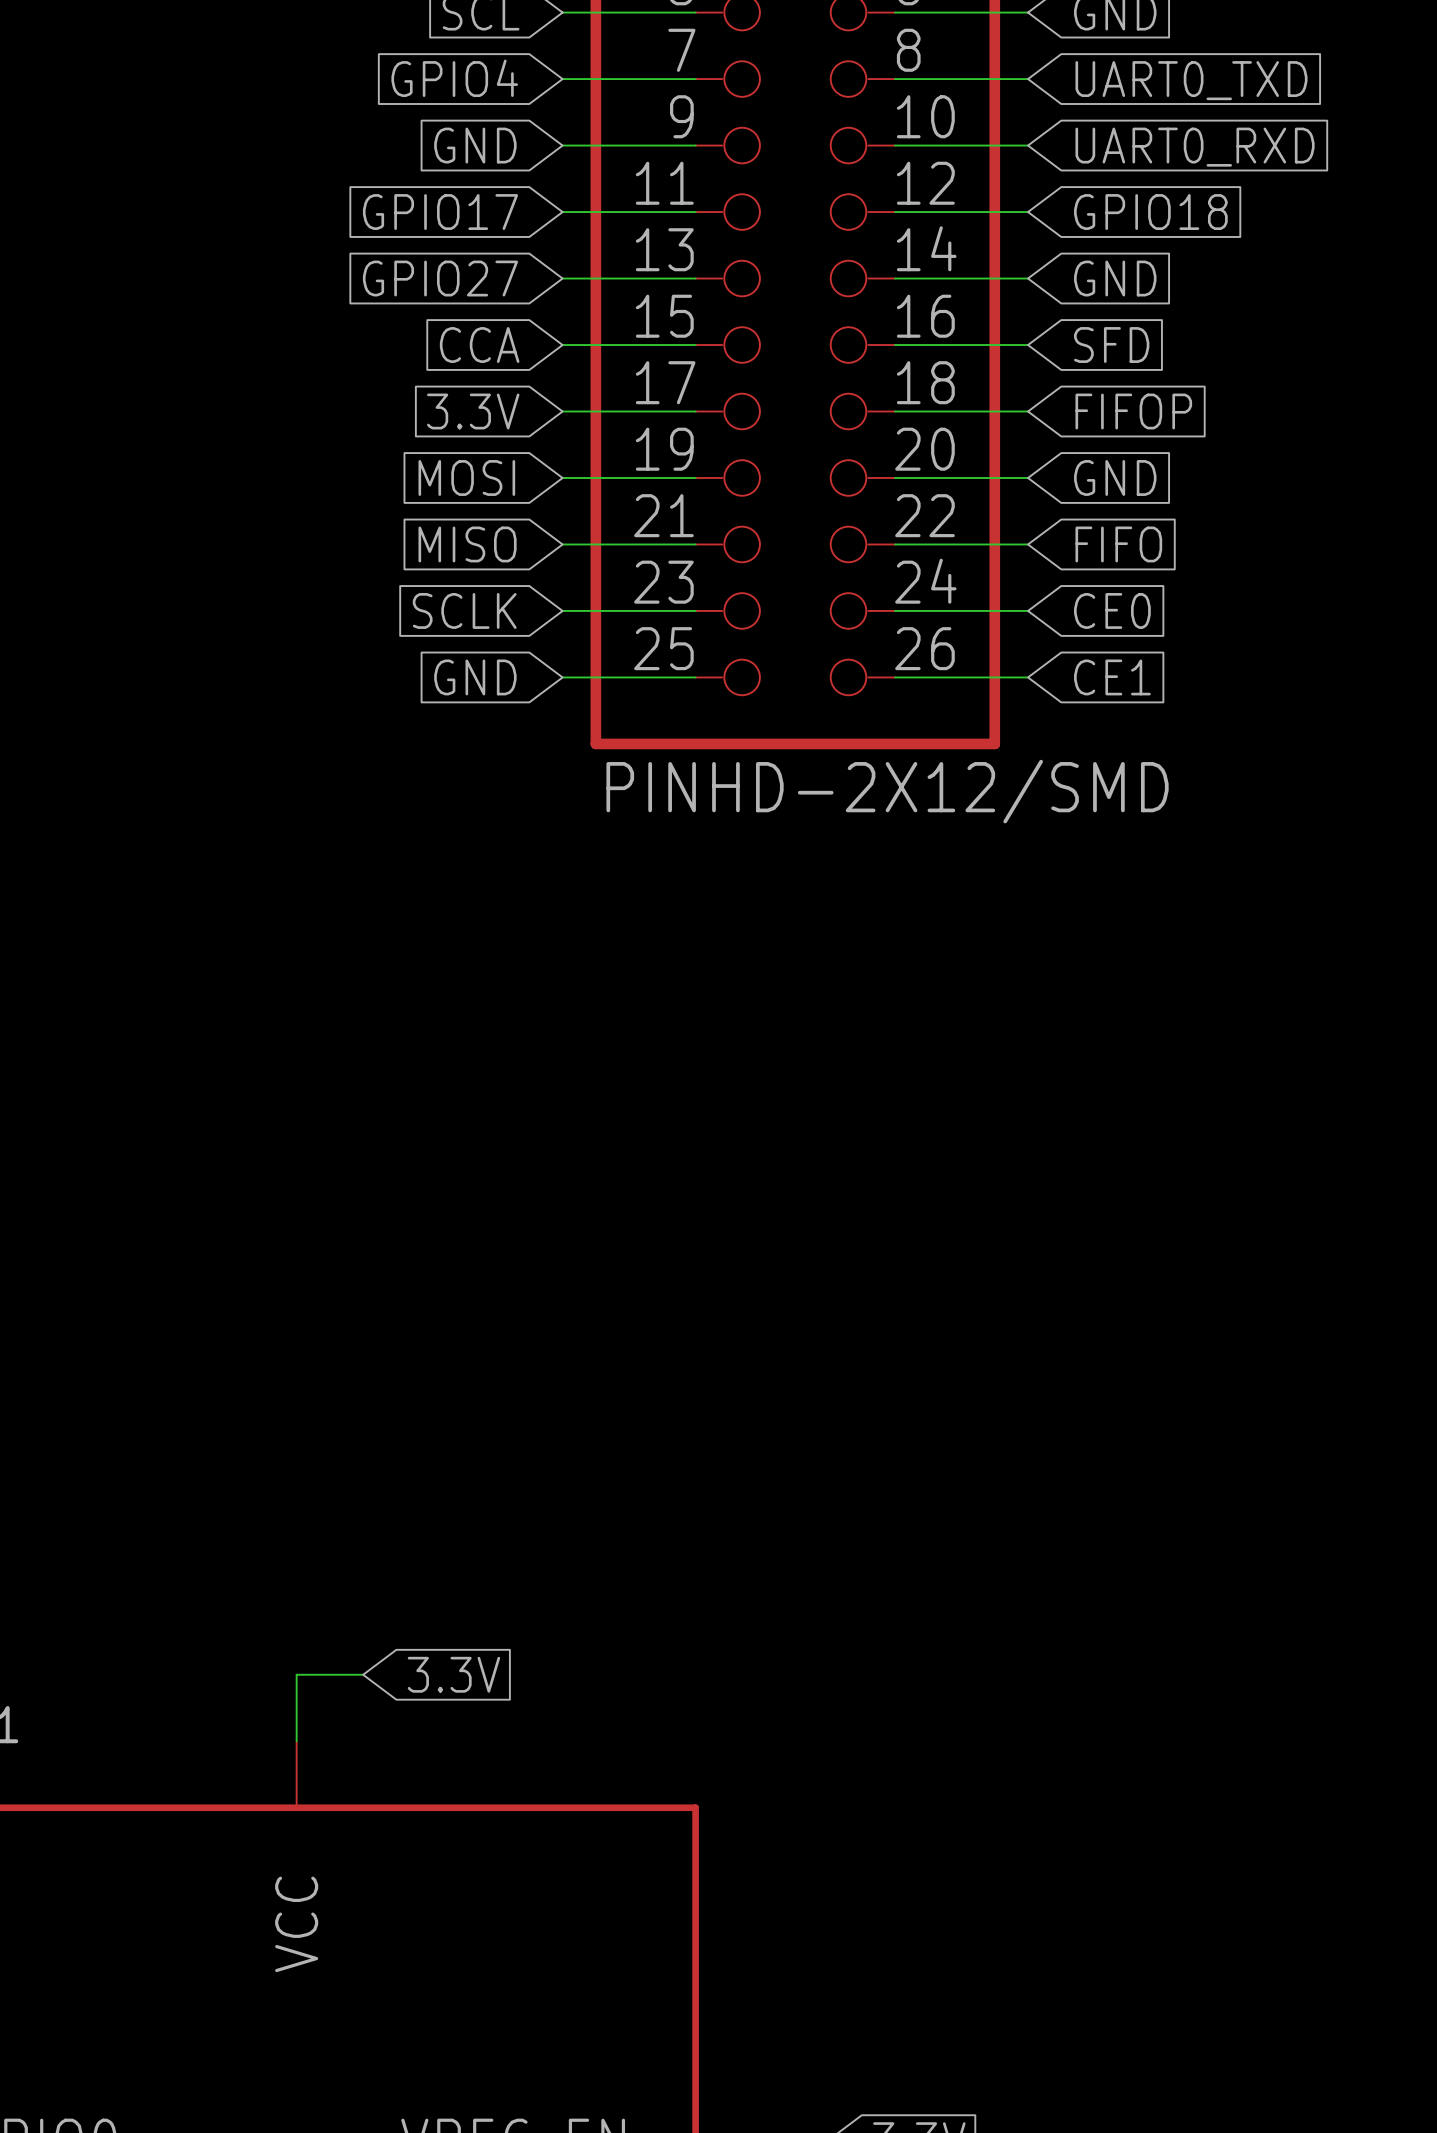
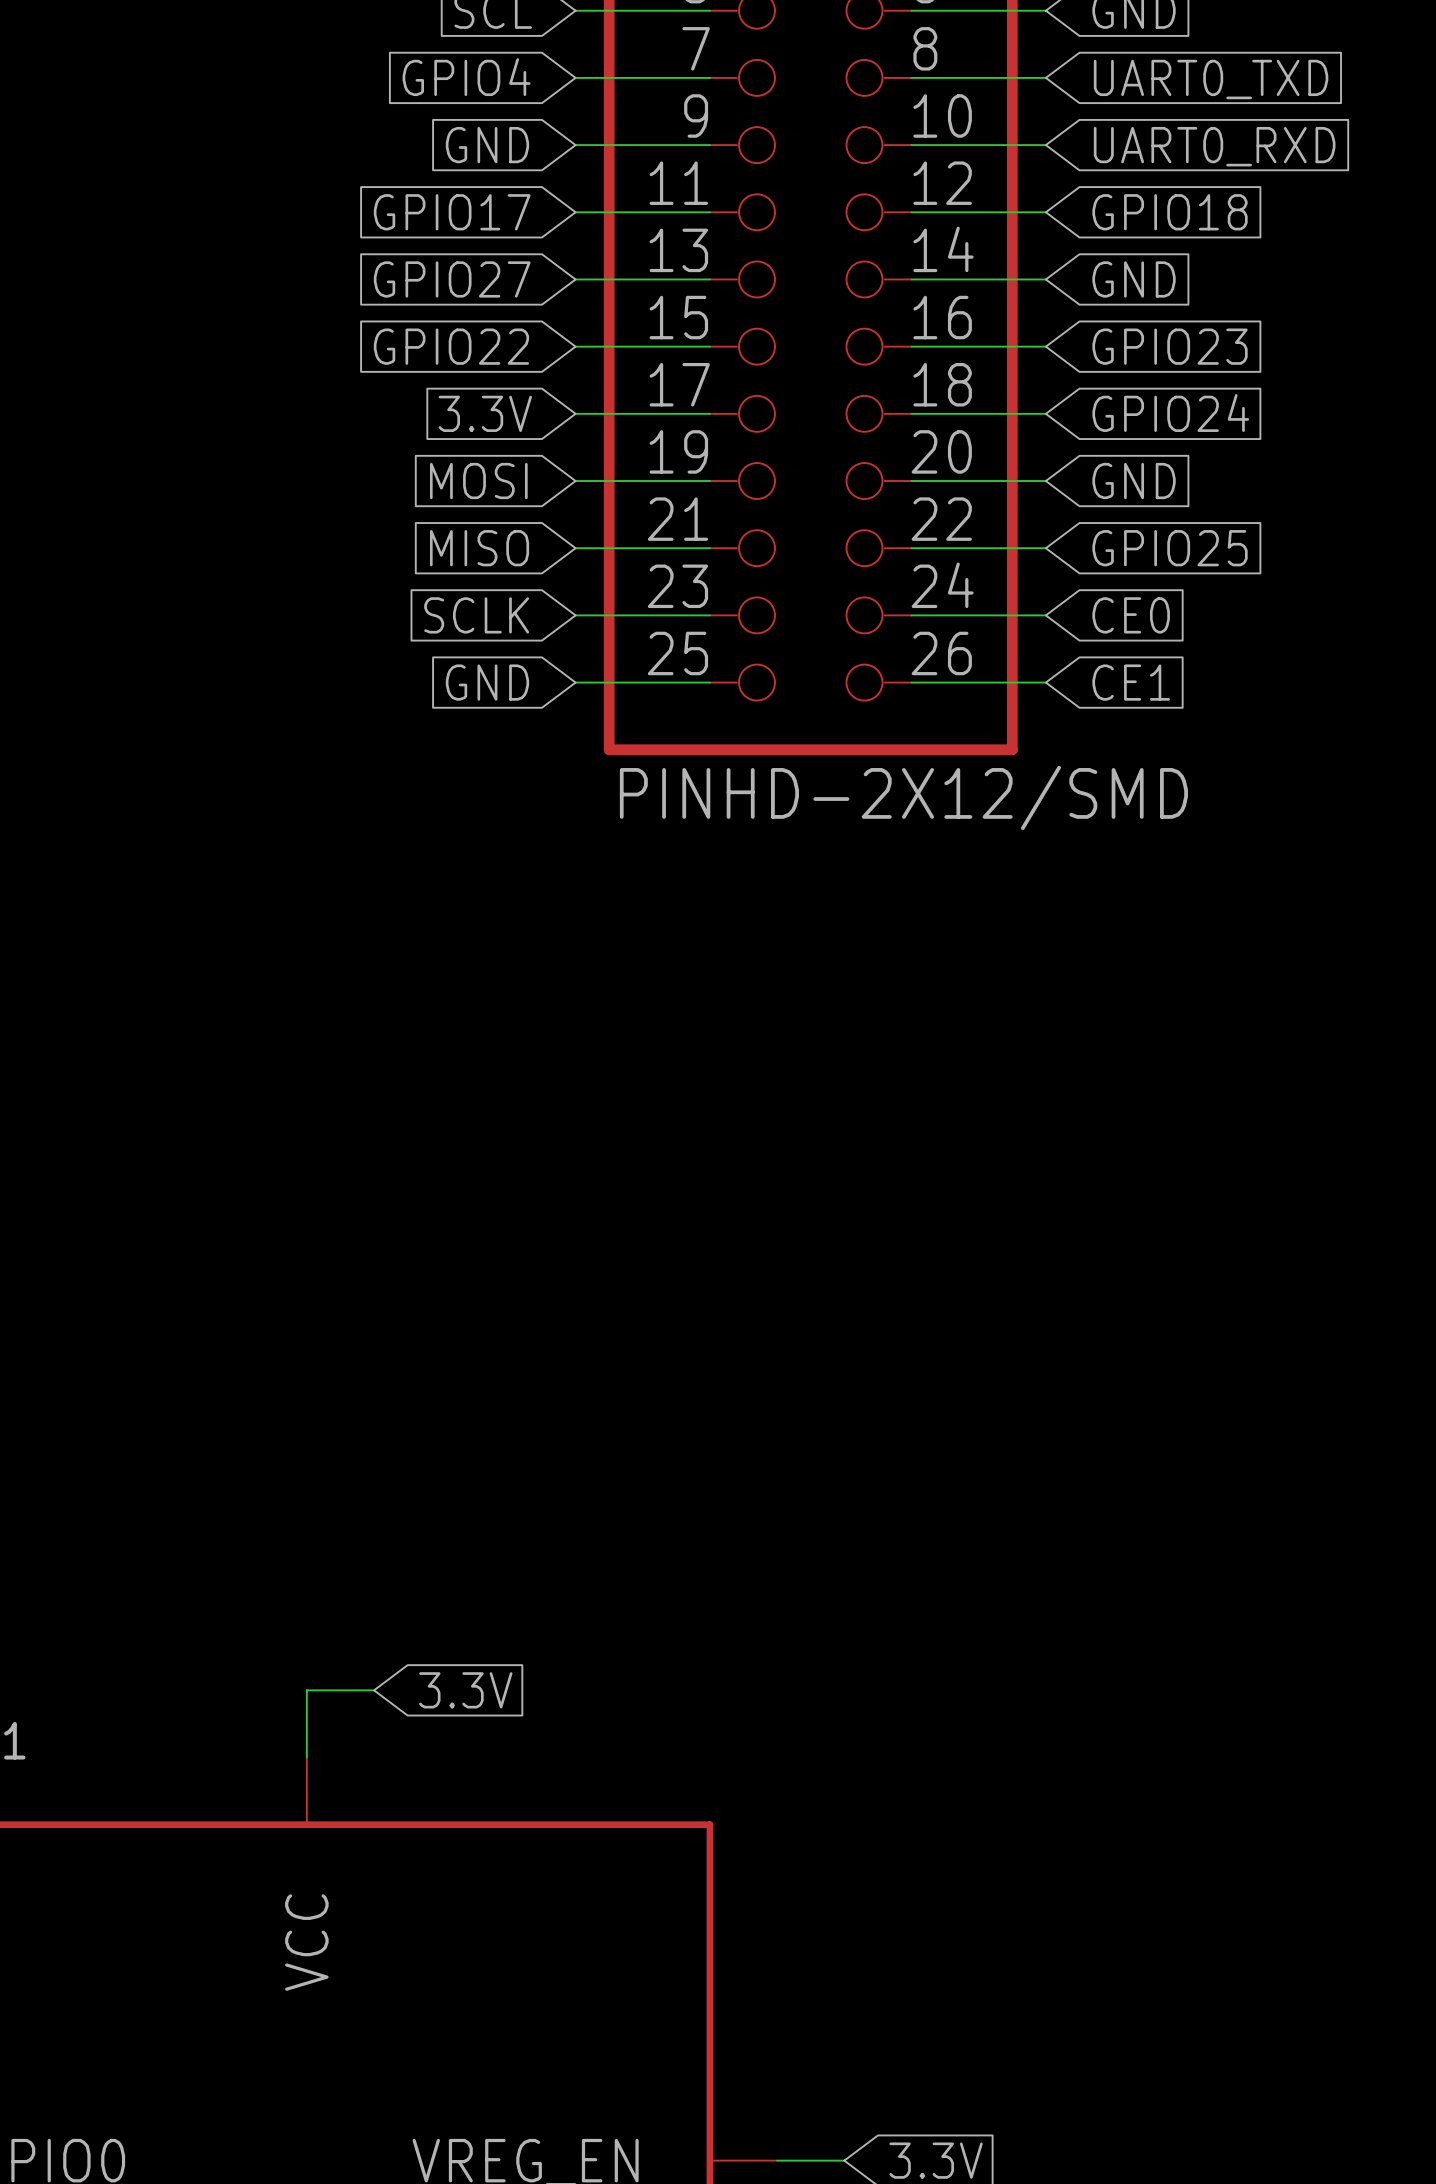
global label: CCA (479, 345) -> GPIO22 (451, 346)
global label: SFD (1111, 345) -> GPIO23 (1170, 346)
global label: FIFOP (1133, 411) -> GPIO24 (1170, 413)
global label: FIFO (1118, 544) -> GPIO25 (1170, 548)

